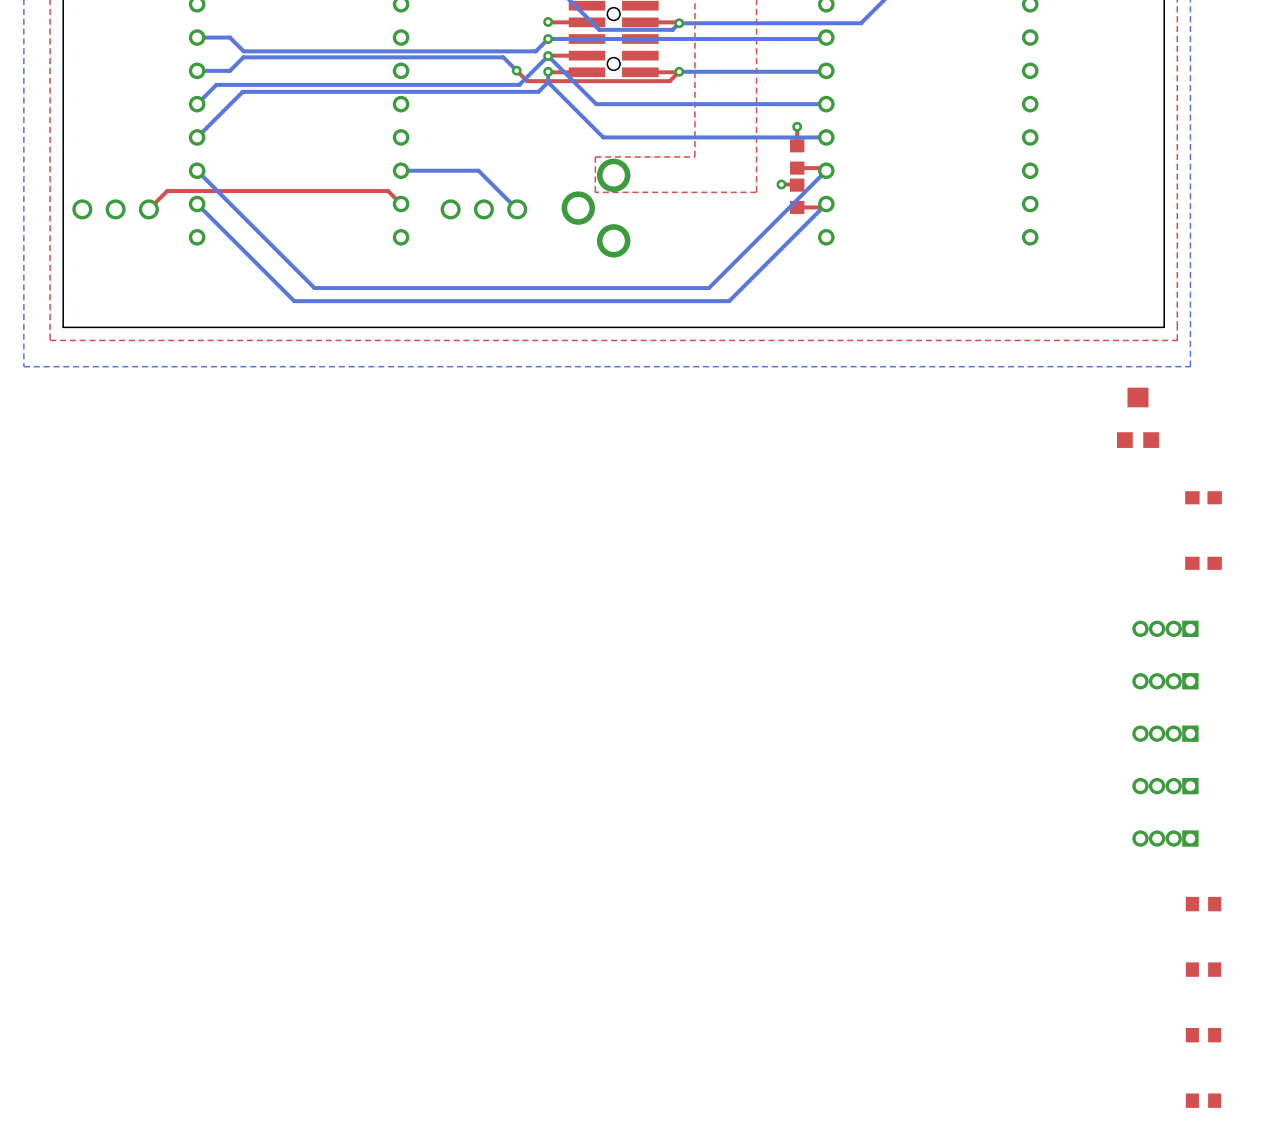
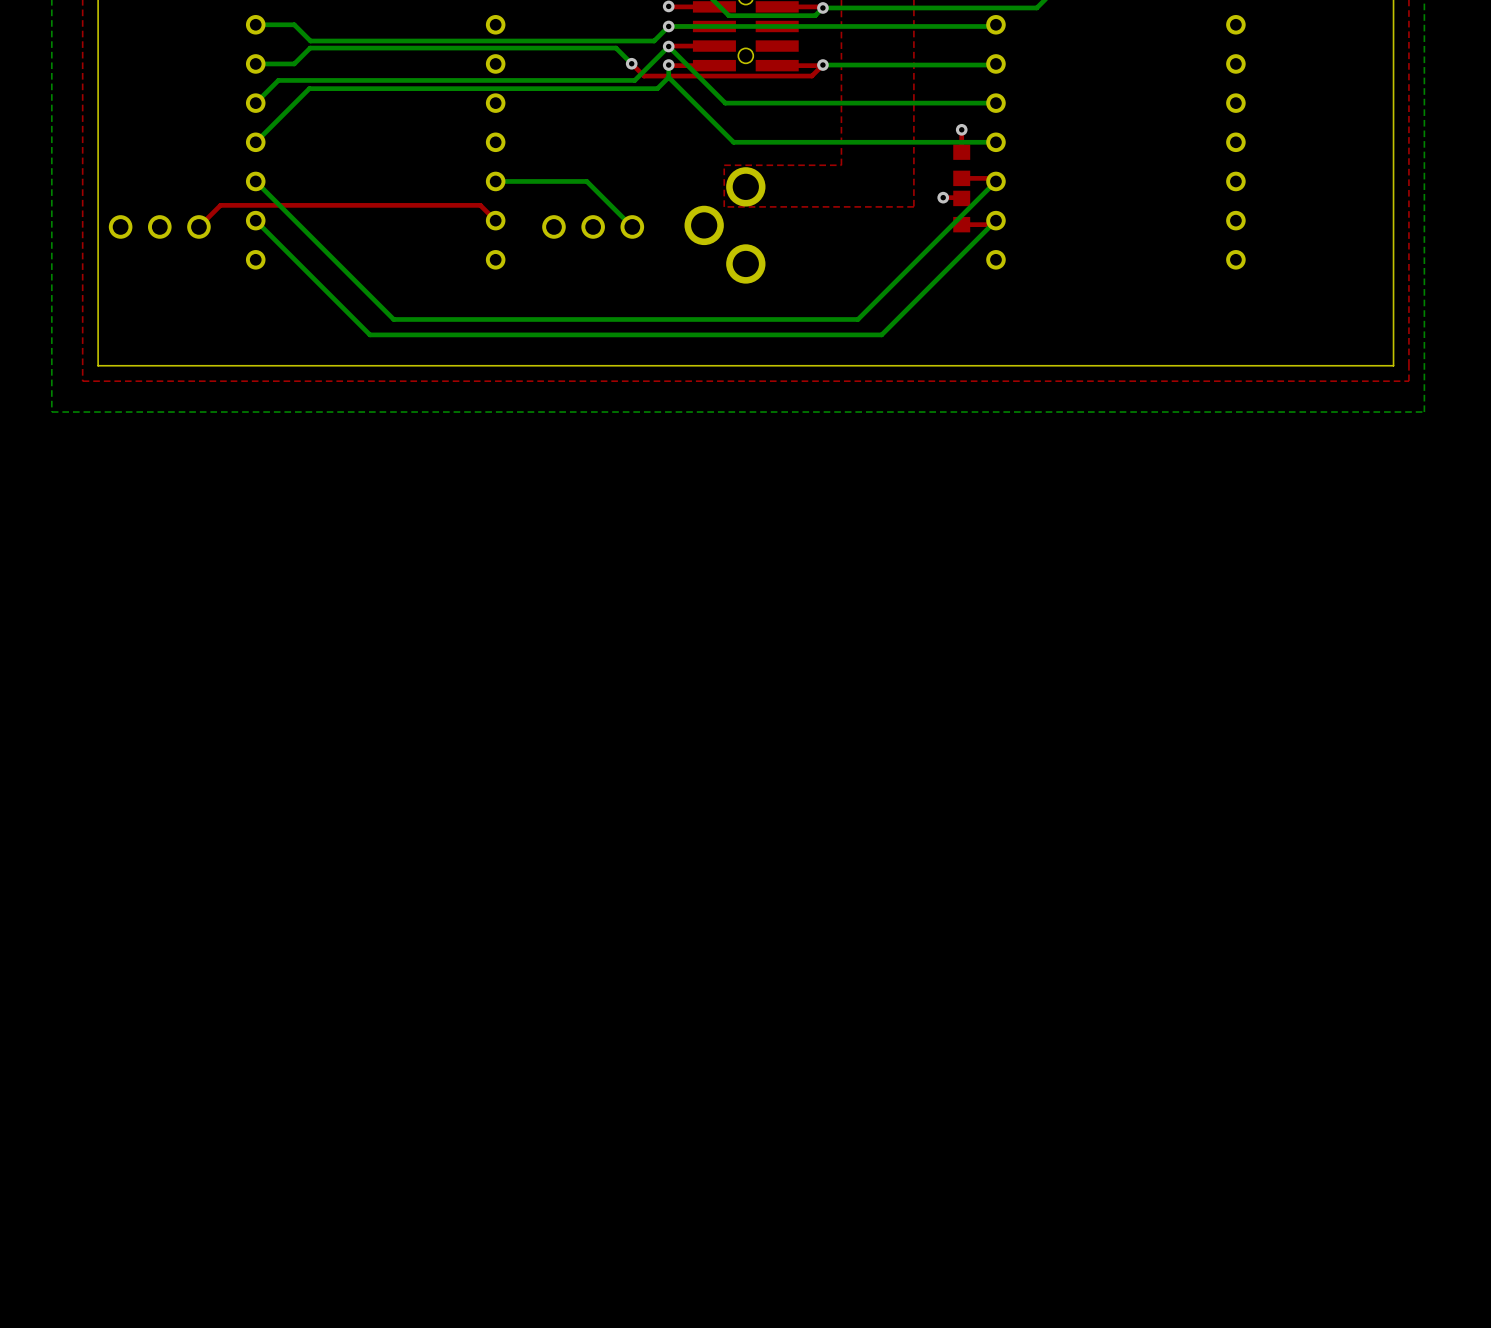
part: (1137, 417) -> none
part: (1203, 497) -> none
part: (1203, 563) -> none
part: (1165, 628) -> none
part: (1165, 681) -> none
part: (1165, 733) -> none
part: (1165, 786) -> none
part: (1165, 838) -> none
part: (1203, 904) -> none
part: (1203, 969) -> none
part: (1203, 1035) -> none
part: (1203, 1100) -> none

